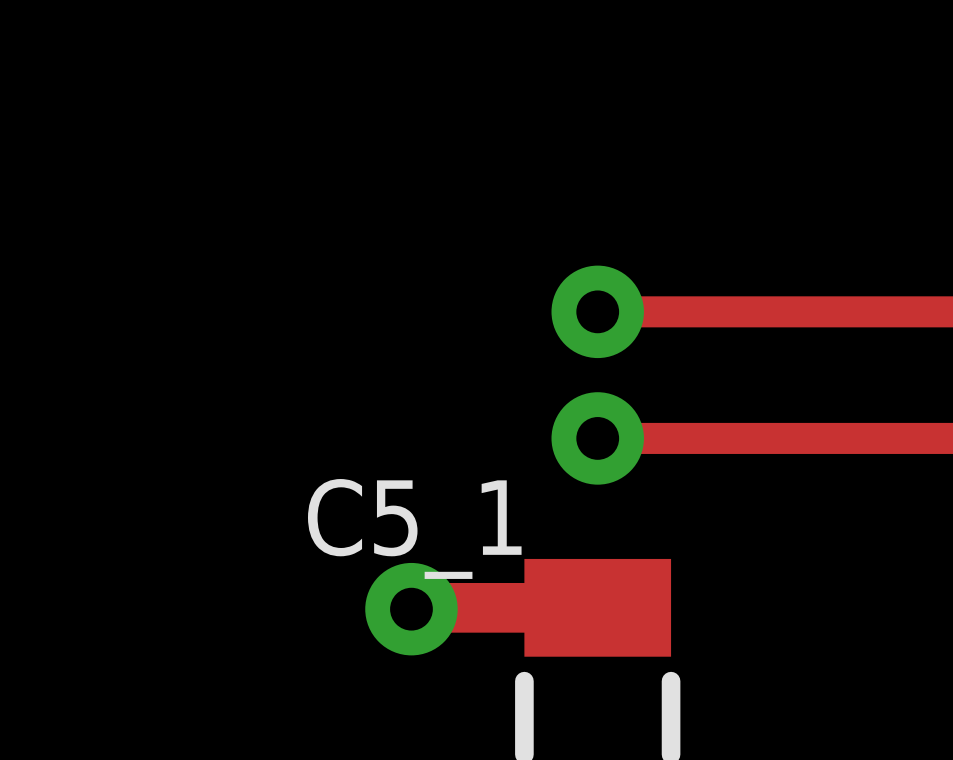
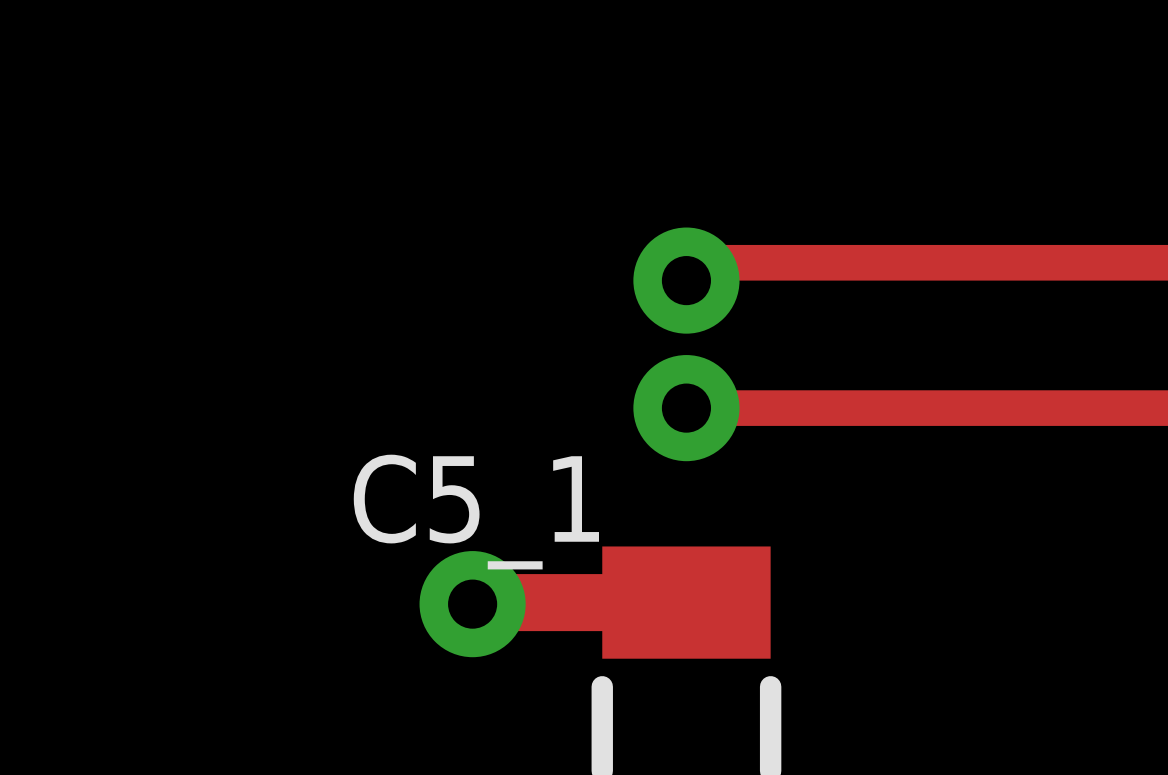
via position: (597, 311) -> (686, 280)

